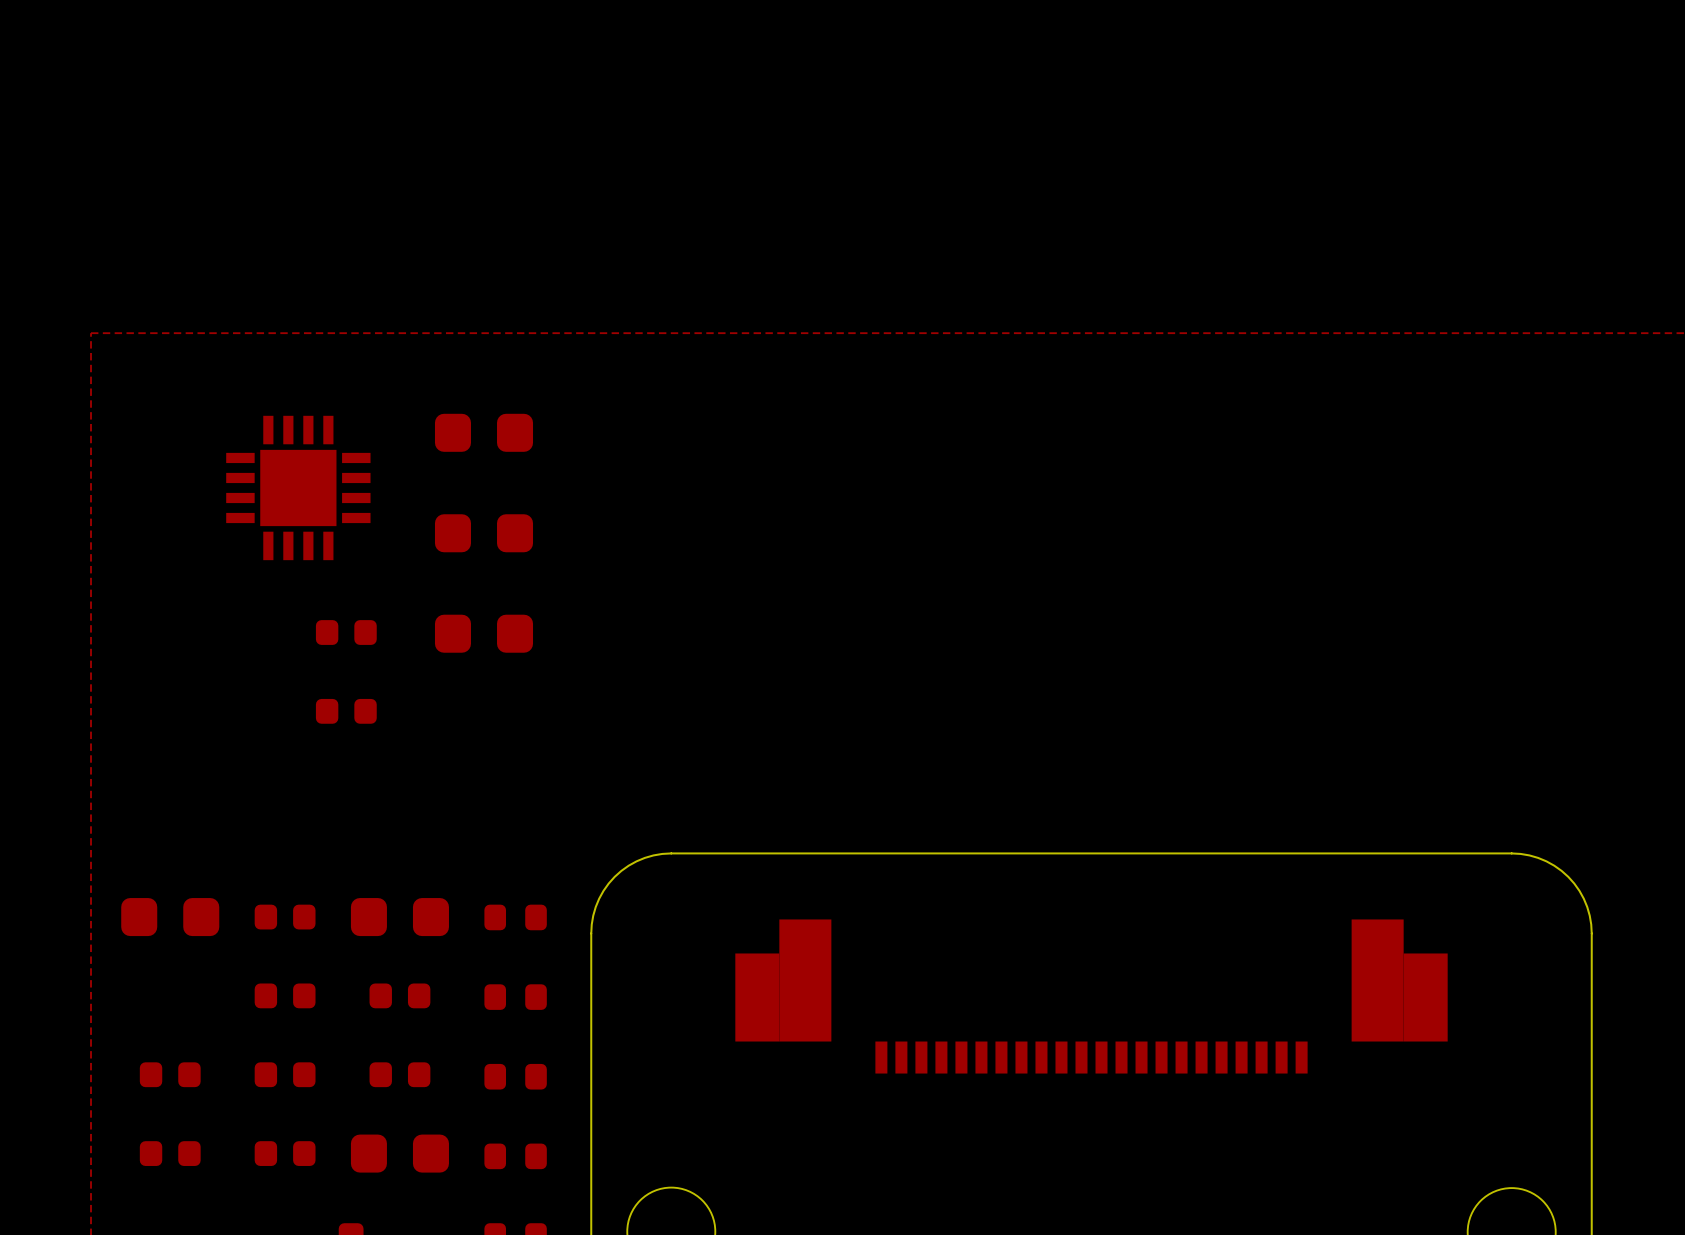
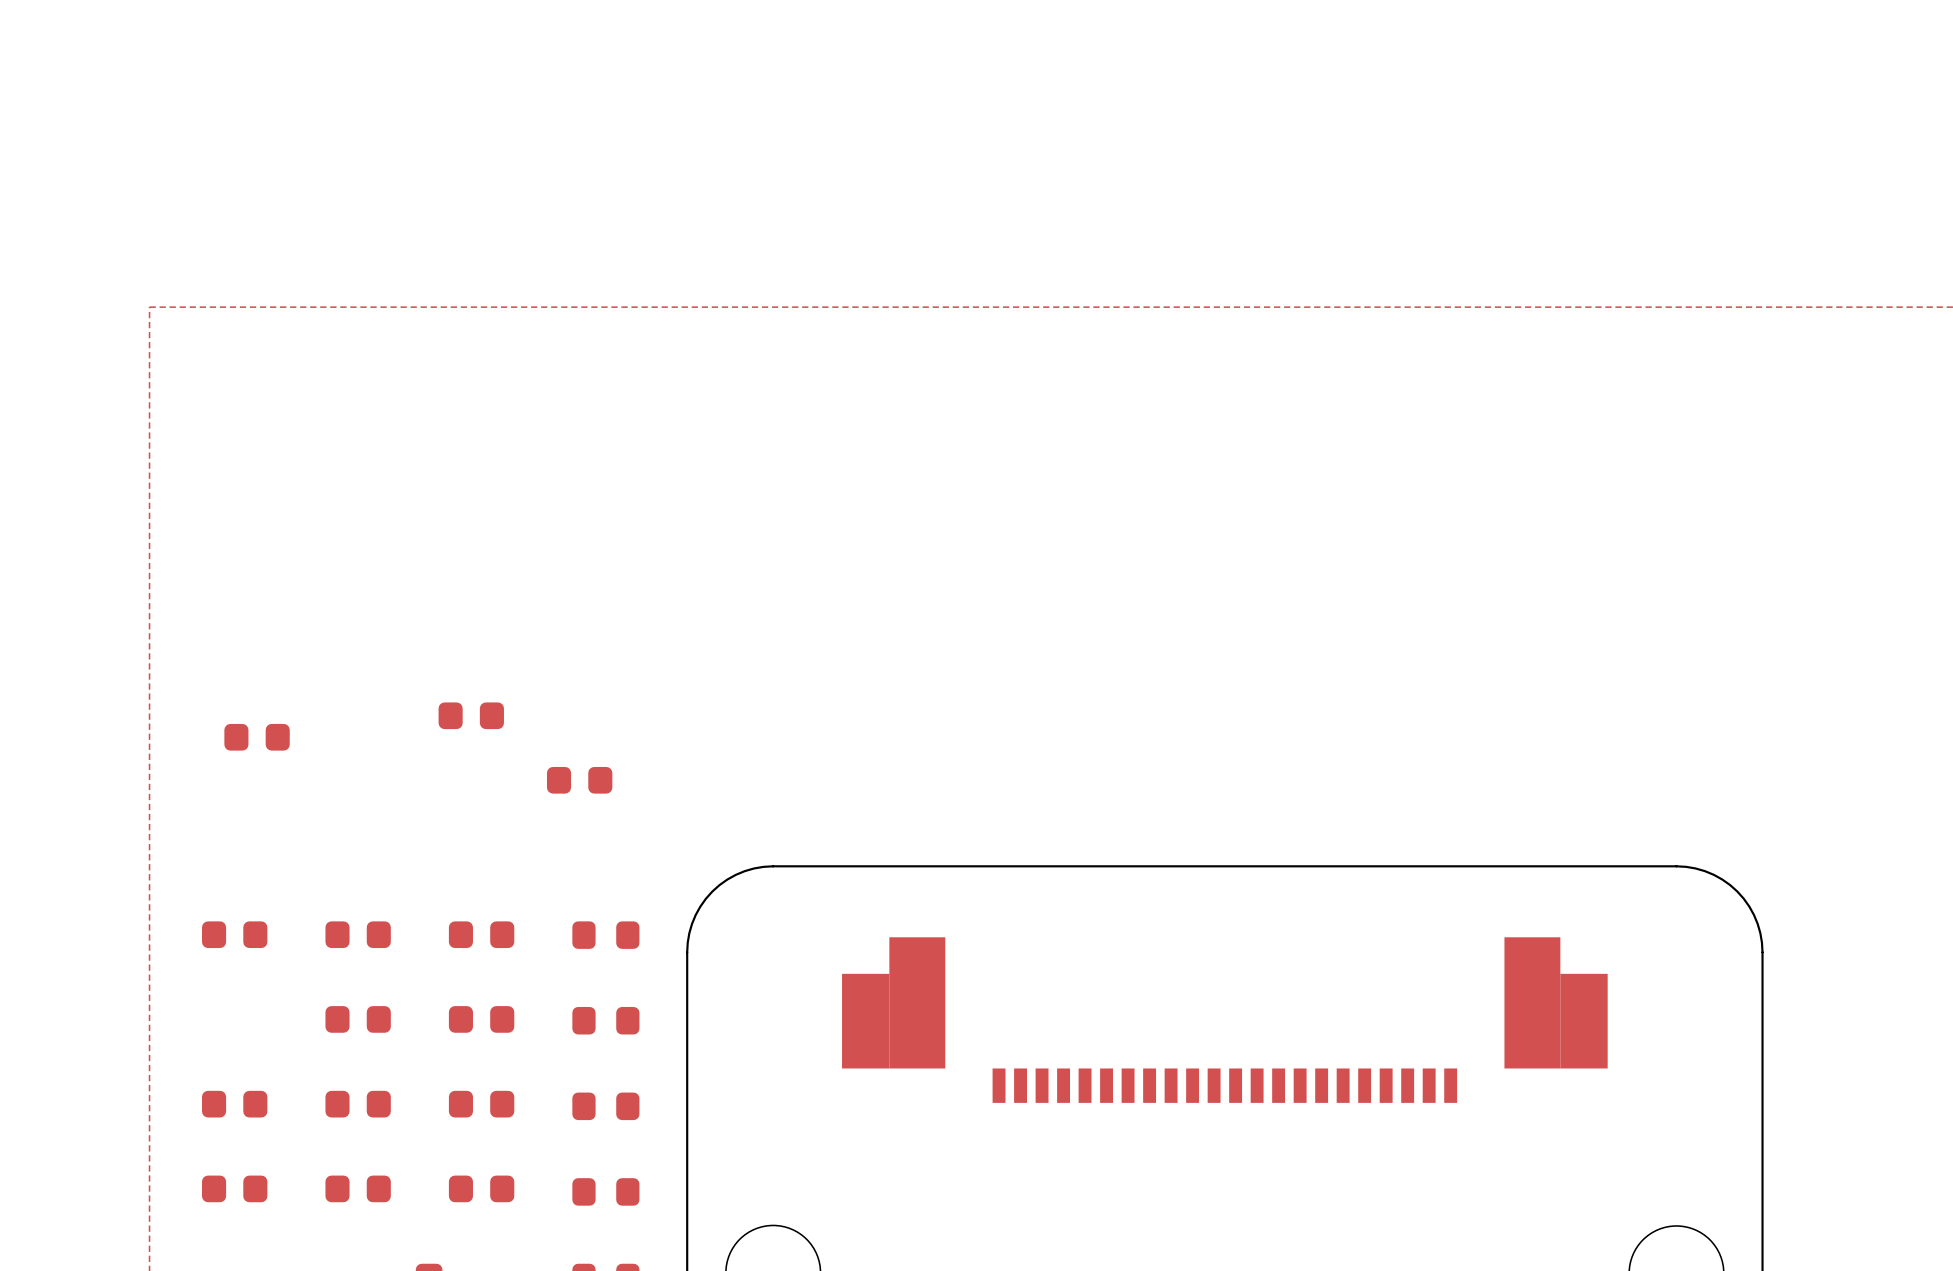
part: (484, 432) -> none
part: (298, 487) -> none
part: (484, 533) -> none
part: (346, 632) -> none
part: (484, 633) -> none
part position: (346, 711) -> (471, 715)
part: none -> (257, 737)
part: none -> (579, 780)
part footprint: [121, 898, 220, 937] -> [202, 921, 268, 949]
part footprint: [350, 898, 449, 937] -> [448, 921, 515, 949]
part footprint: [350, 1134, 449, 1173] -> [448, 1175, 515, 1203]

